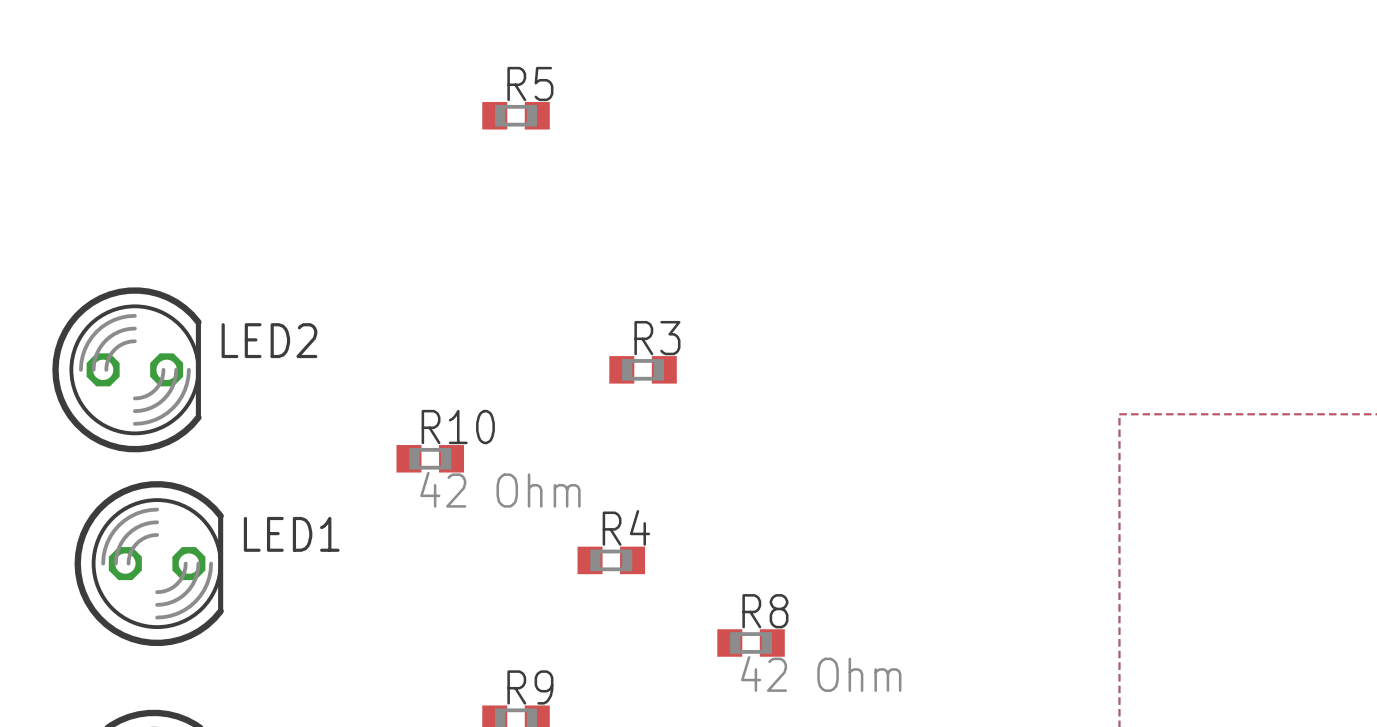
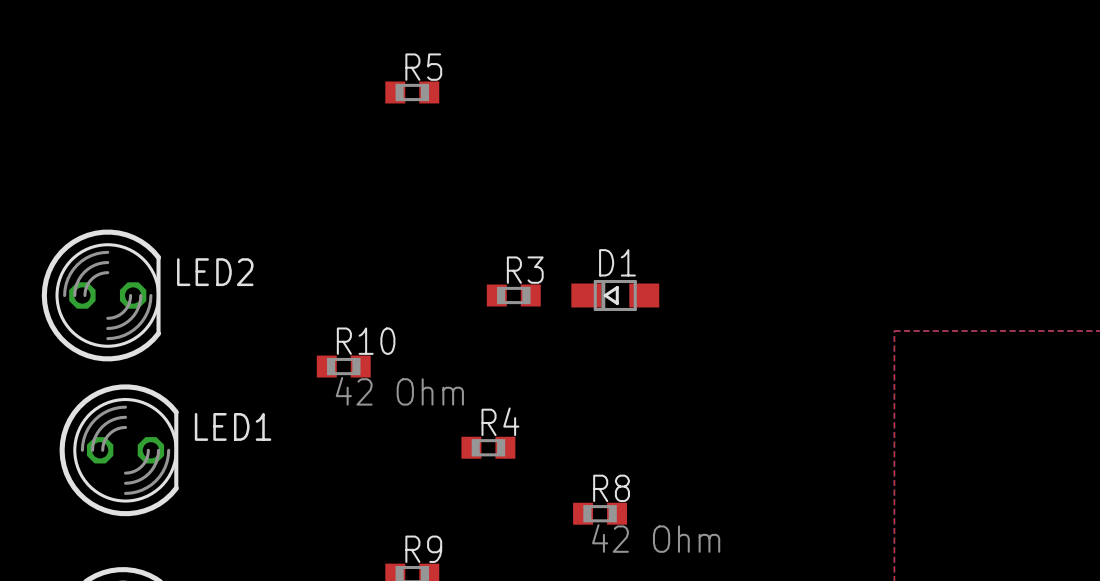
D1: none -> (615, 295)

